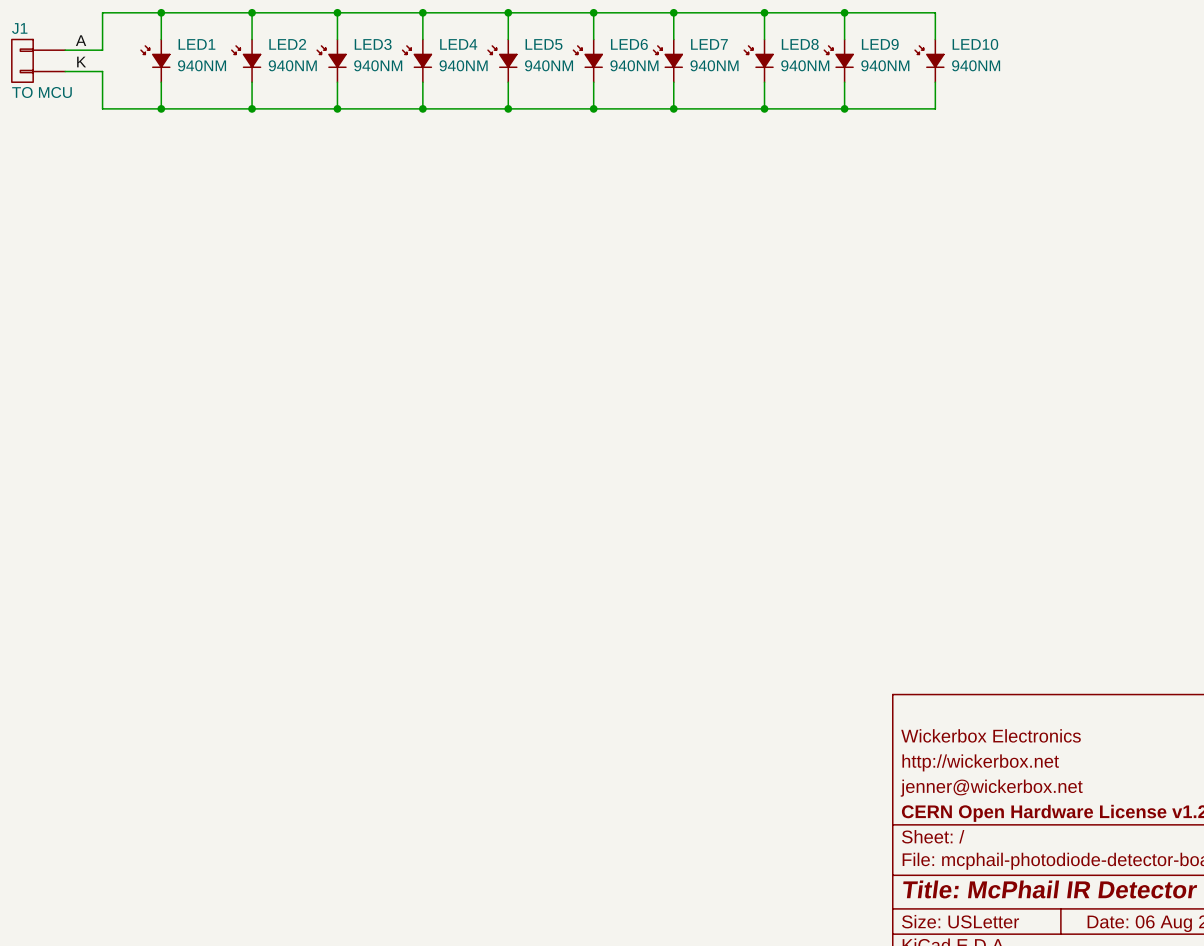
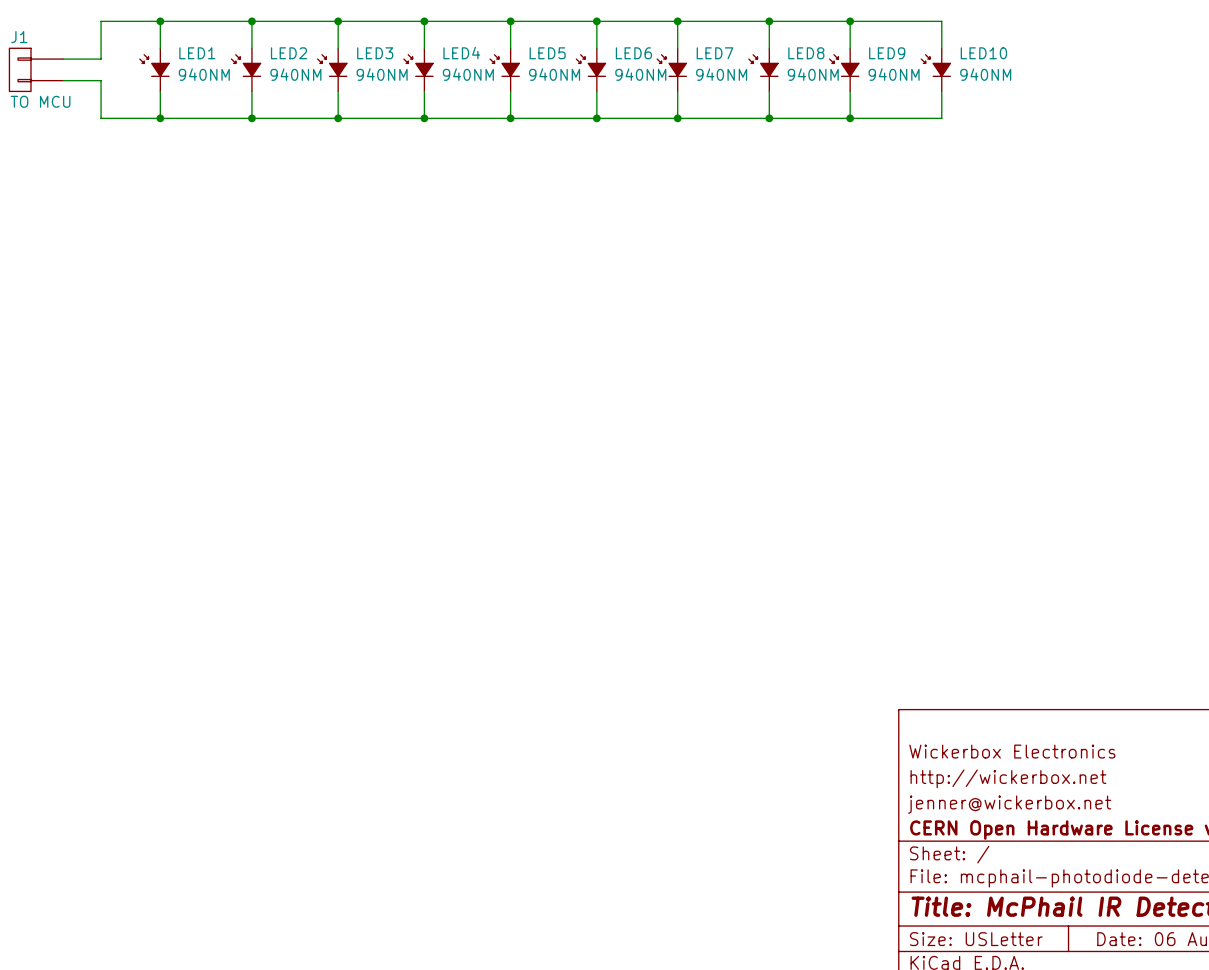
label: A (81, 40) -> none
label: K (81, 62) -> none

